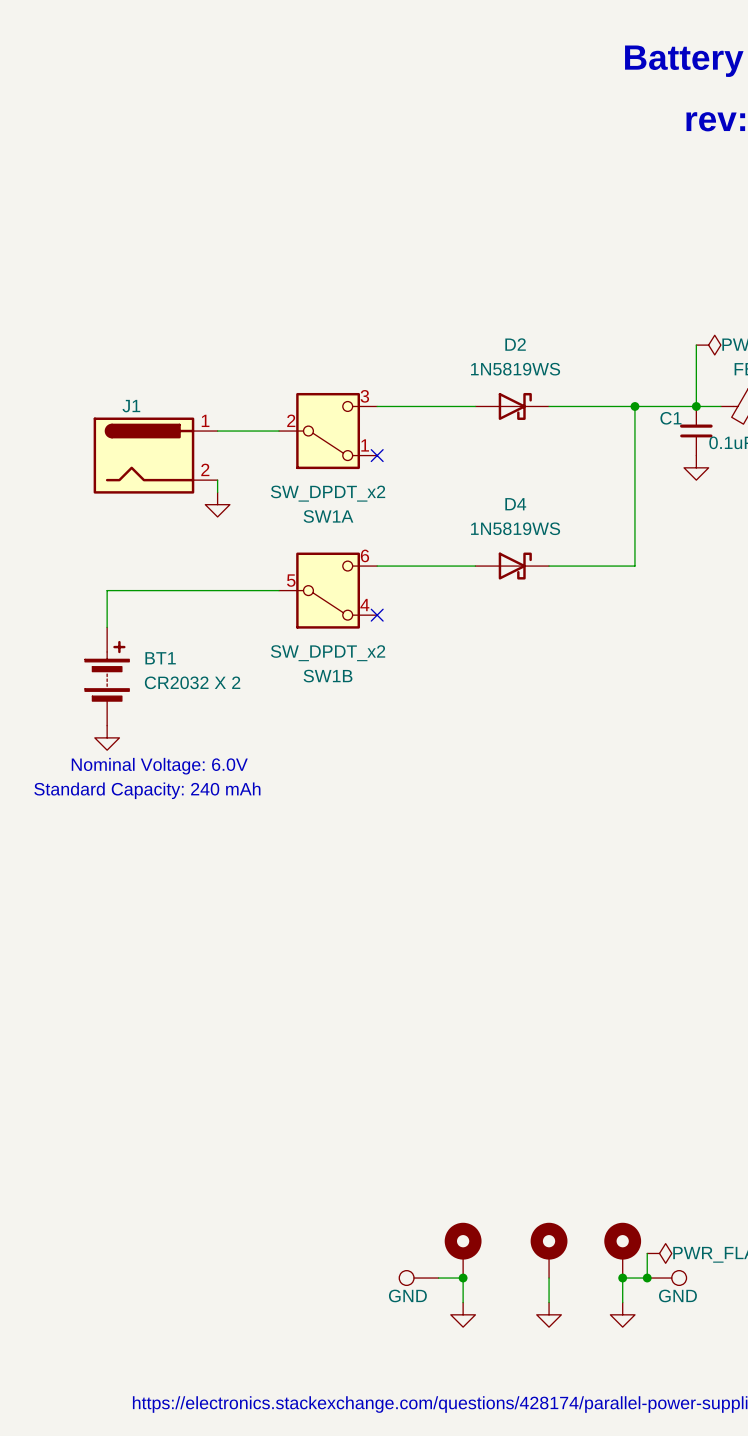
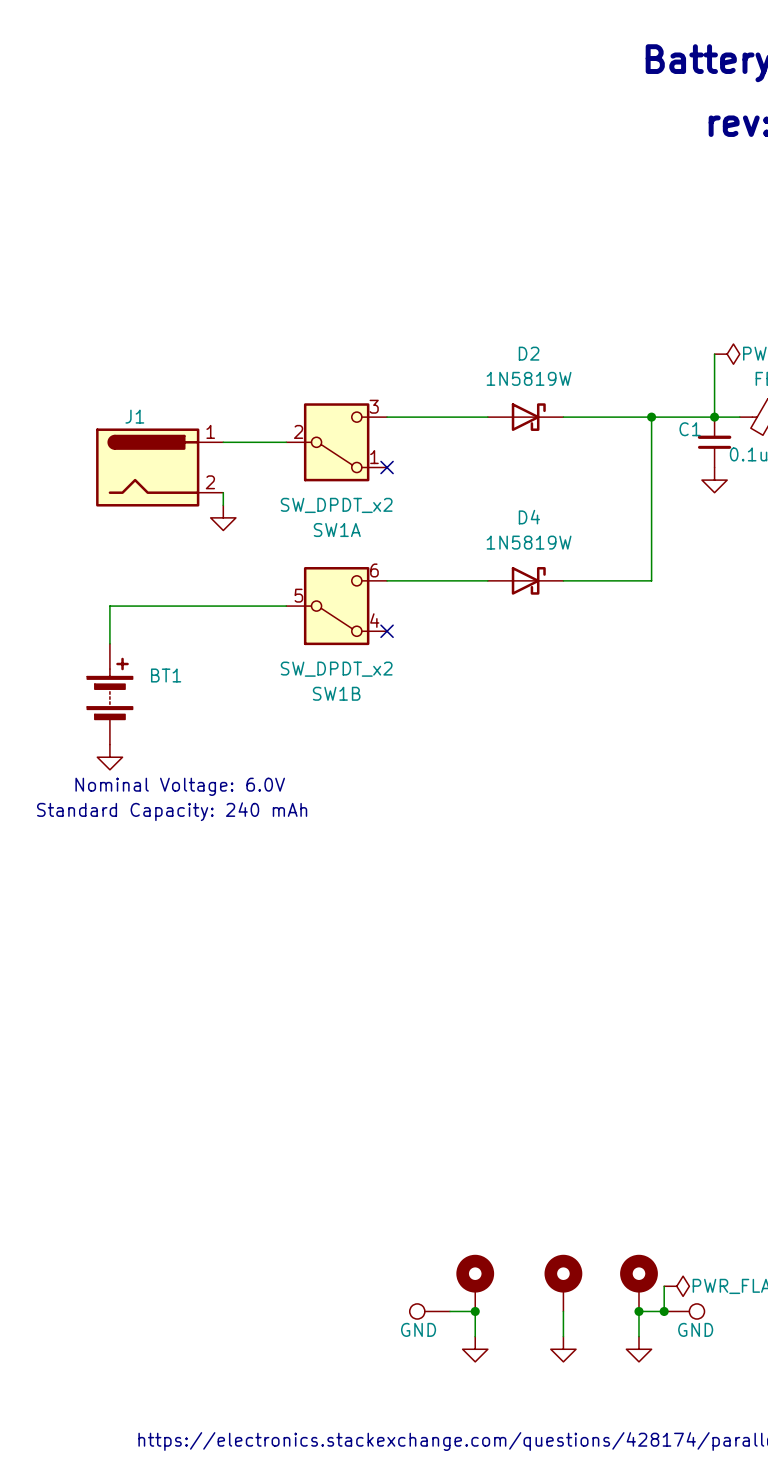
D2 value: 1N5819WS (515, 369) -> 1N5819W (529, 378)
D4 value: 1N5819WS (515, 528) -> 1N5819W (529, 542)
BT1 value: CR2032 X 2 (192, 682) -> none

